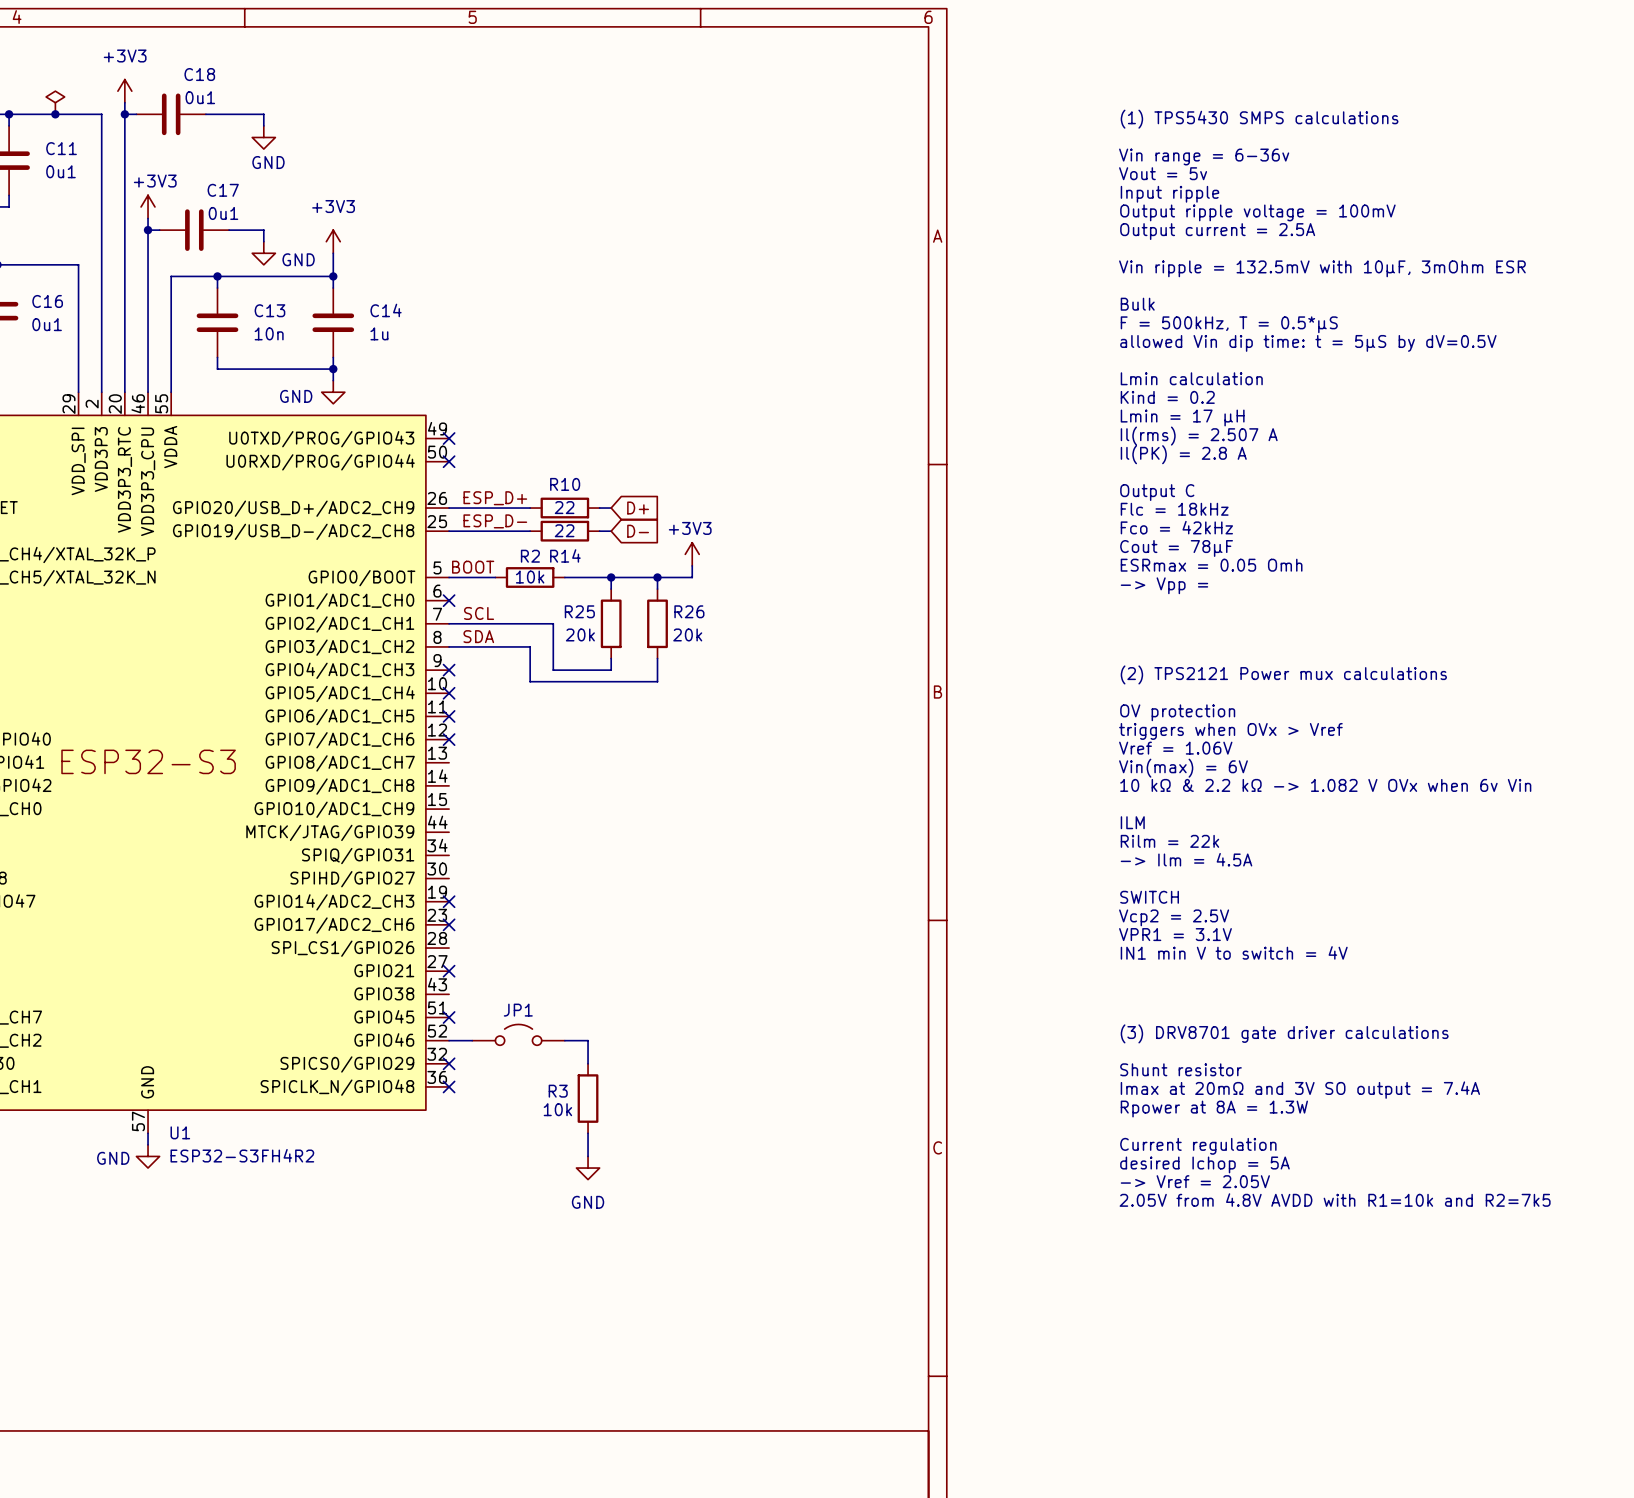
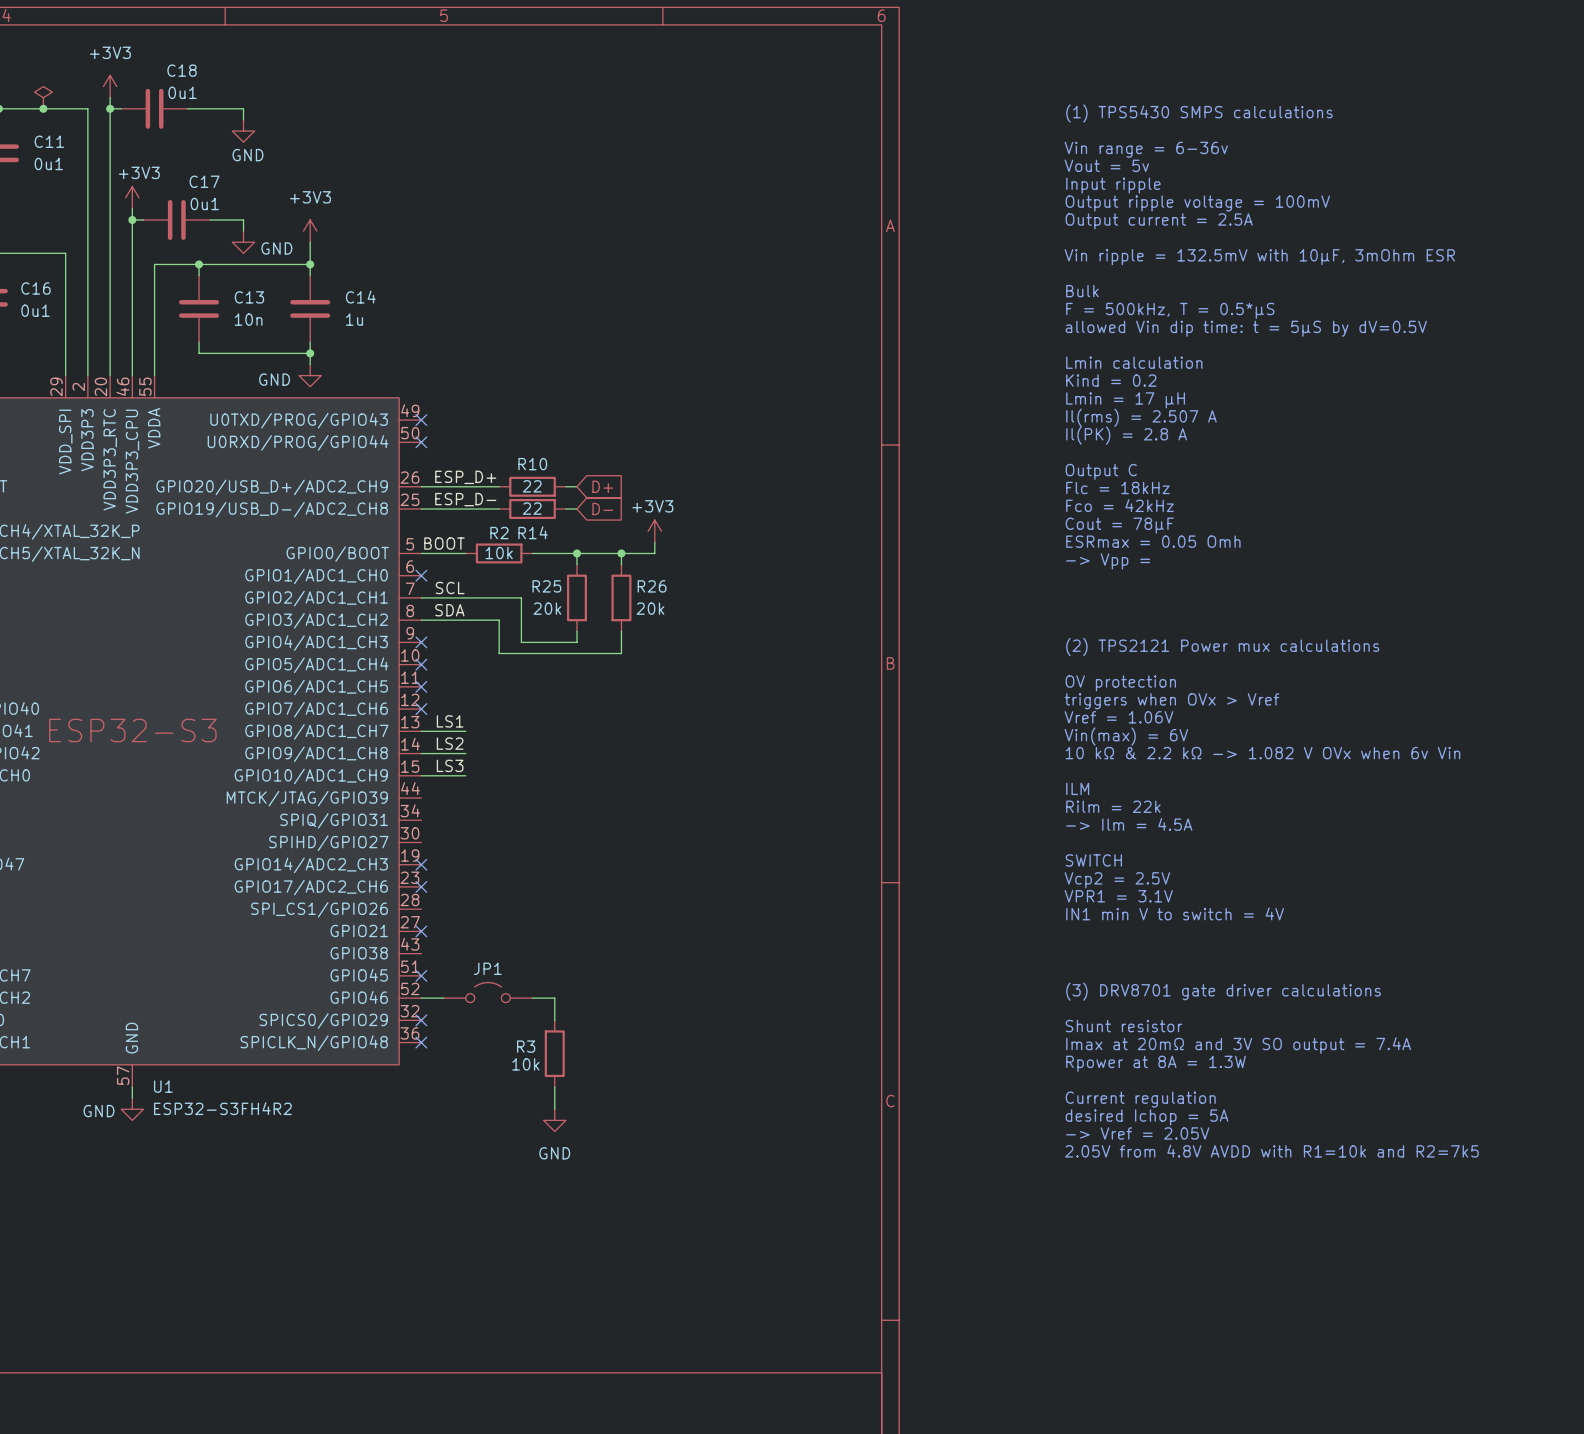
label: none -> LS1 (450, 721)
wire: none -> (421, 731) (465, 731)
label: none -> LS2 (450, 743)
wire: none -> (421, 753) (465, 753)
label: none -> LS3 (450, 765)
wire: none -> (421, 775) (465, 775)

